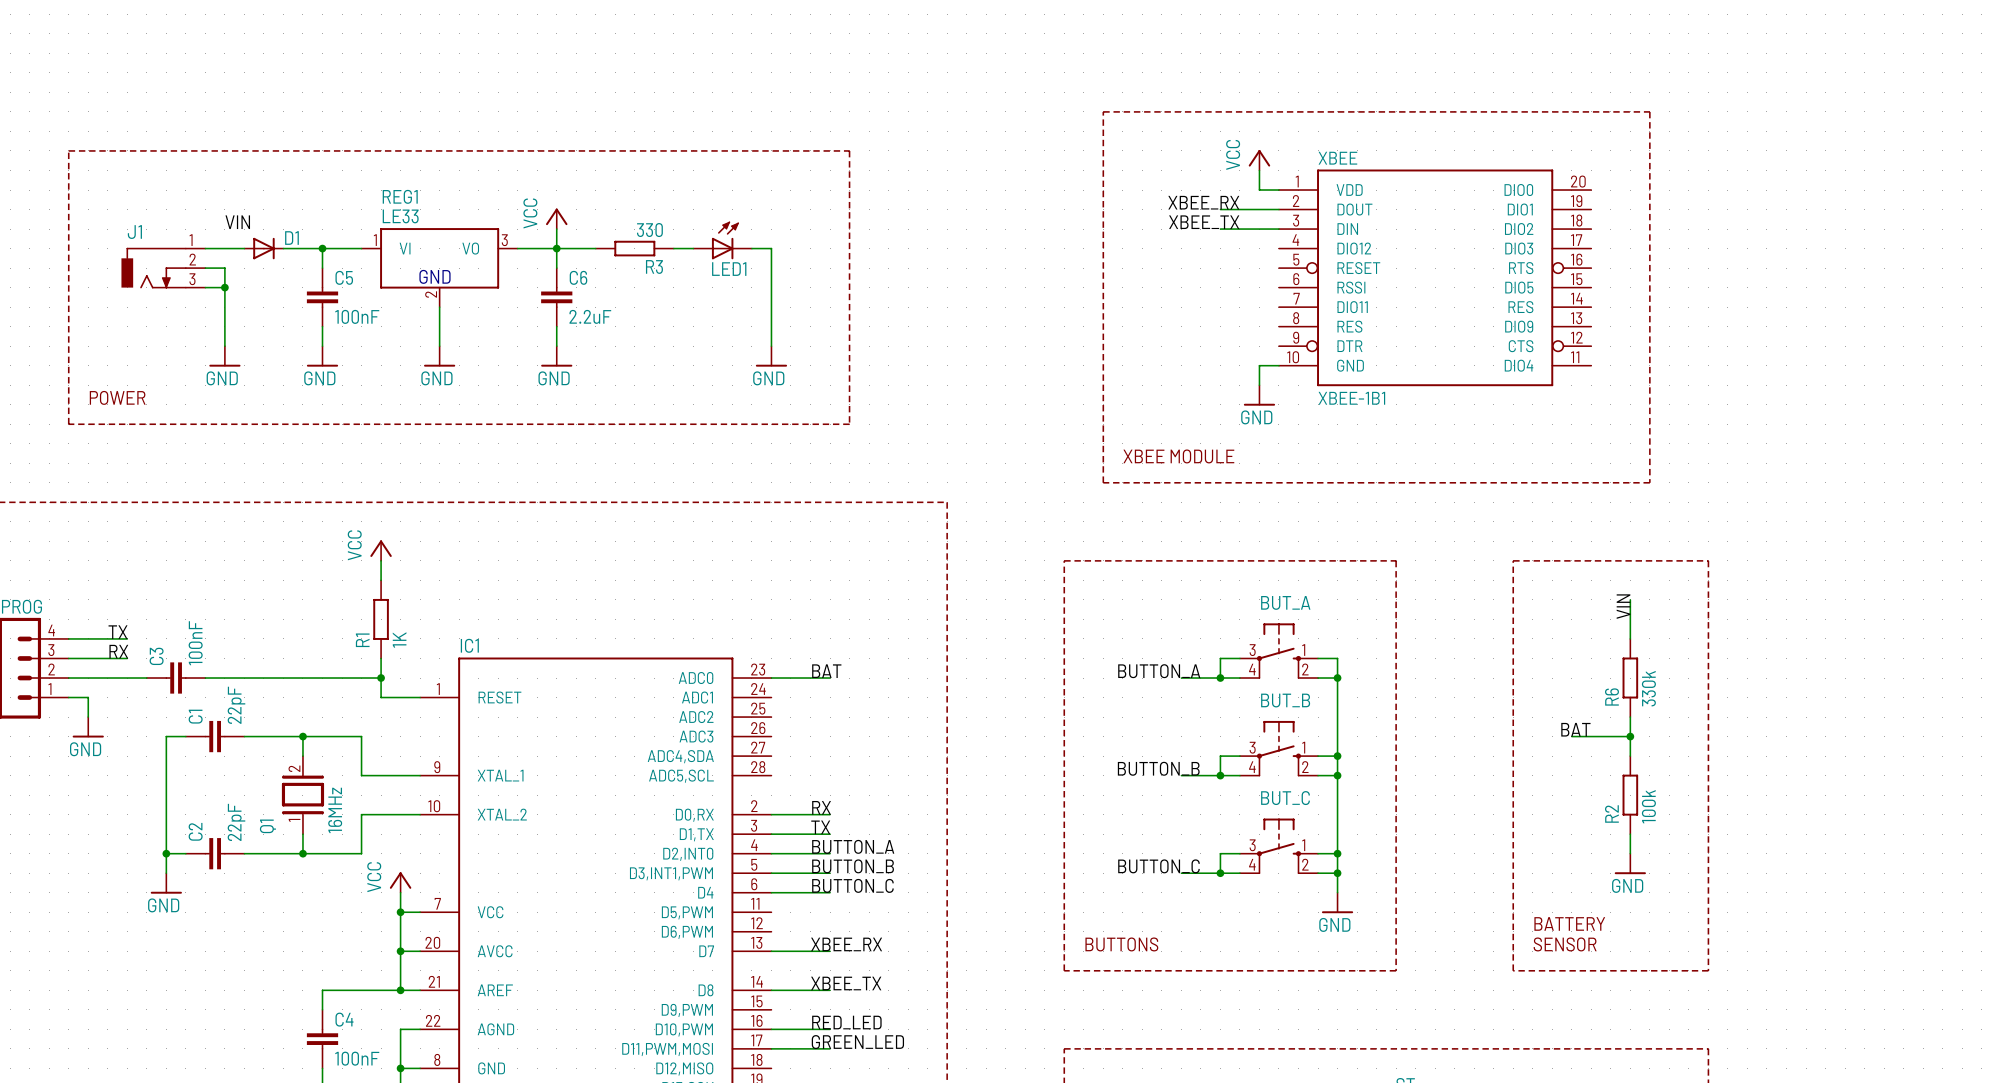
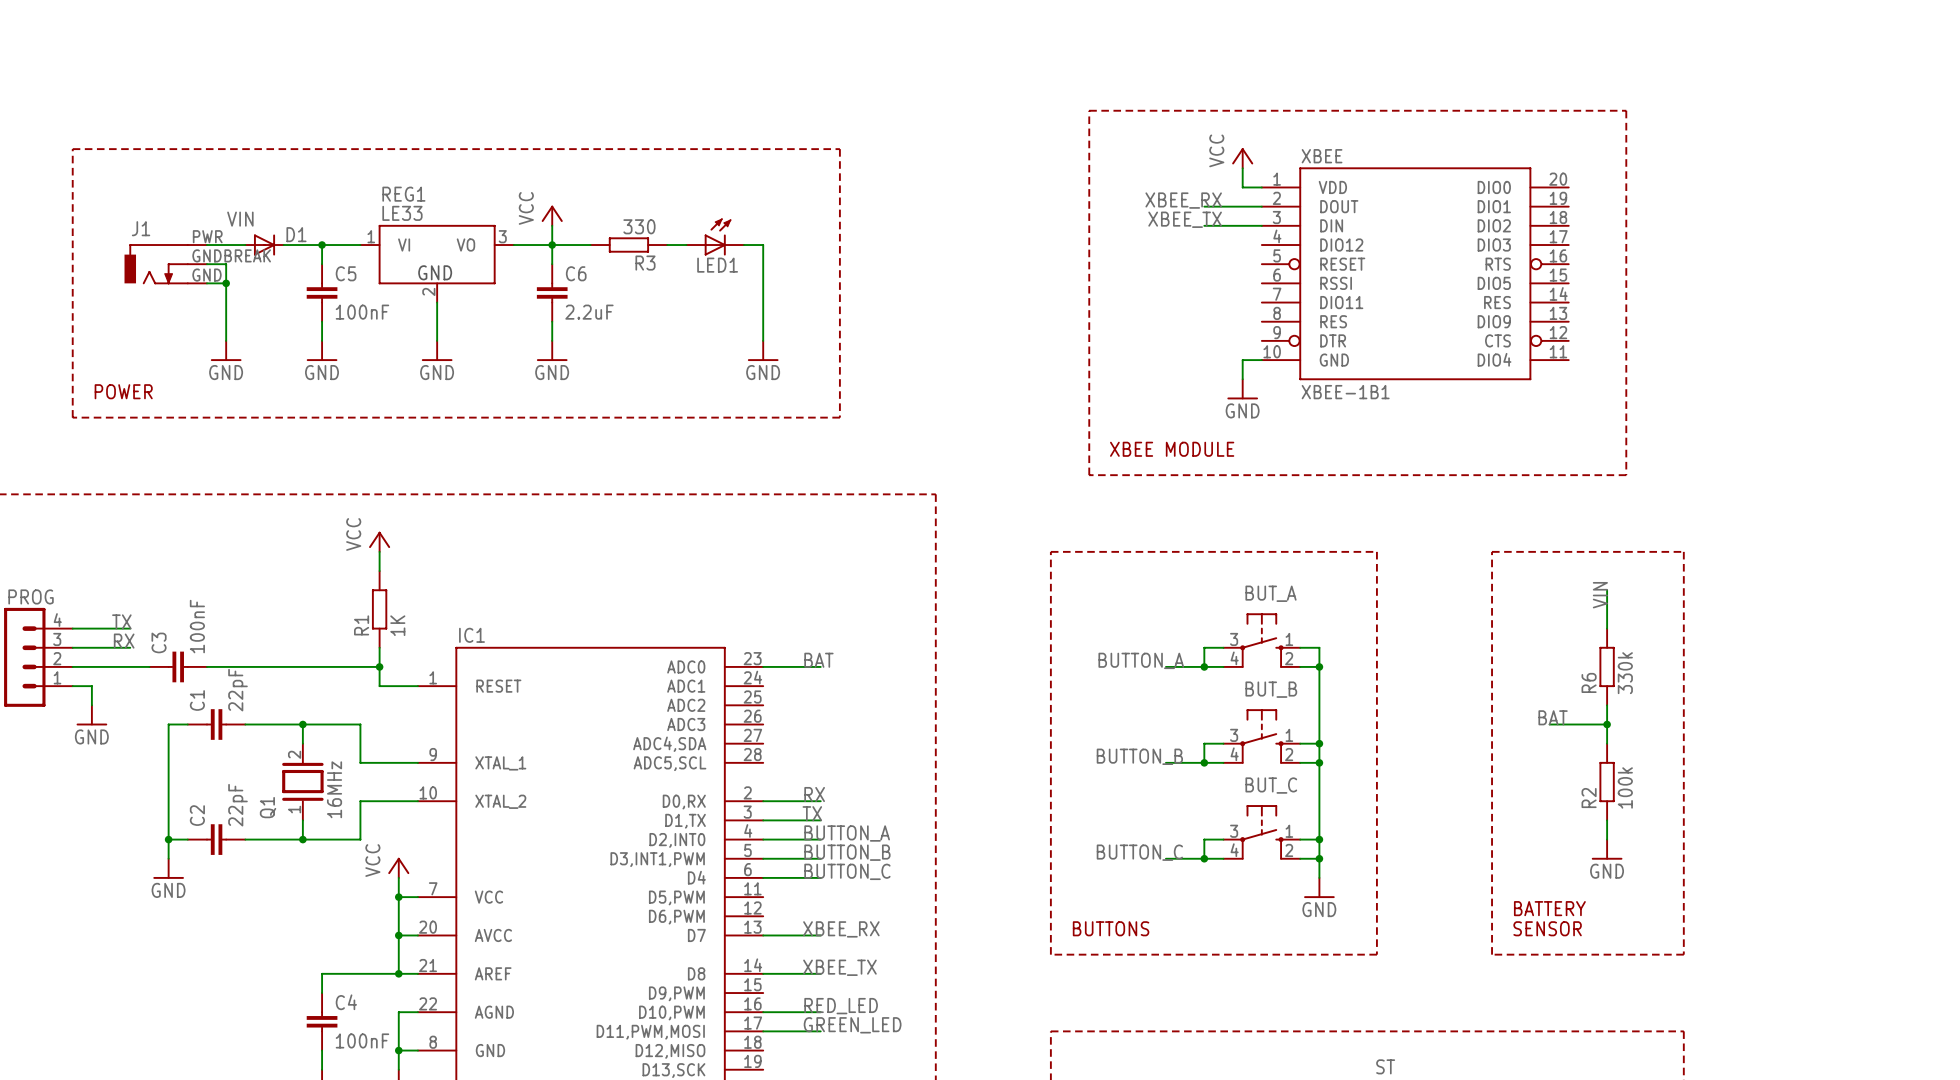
J1 pin number: 1 (191, 240) -> PWR (207, 236)
J1 pin number: 2 (192, 259) -> GNDBREAK (231, 255)
J1 pin number: 3 (192, 279) -> GND (206, 275)

